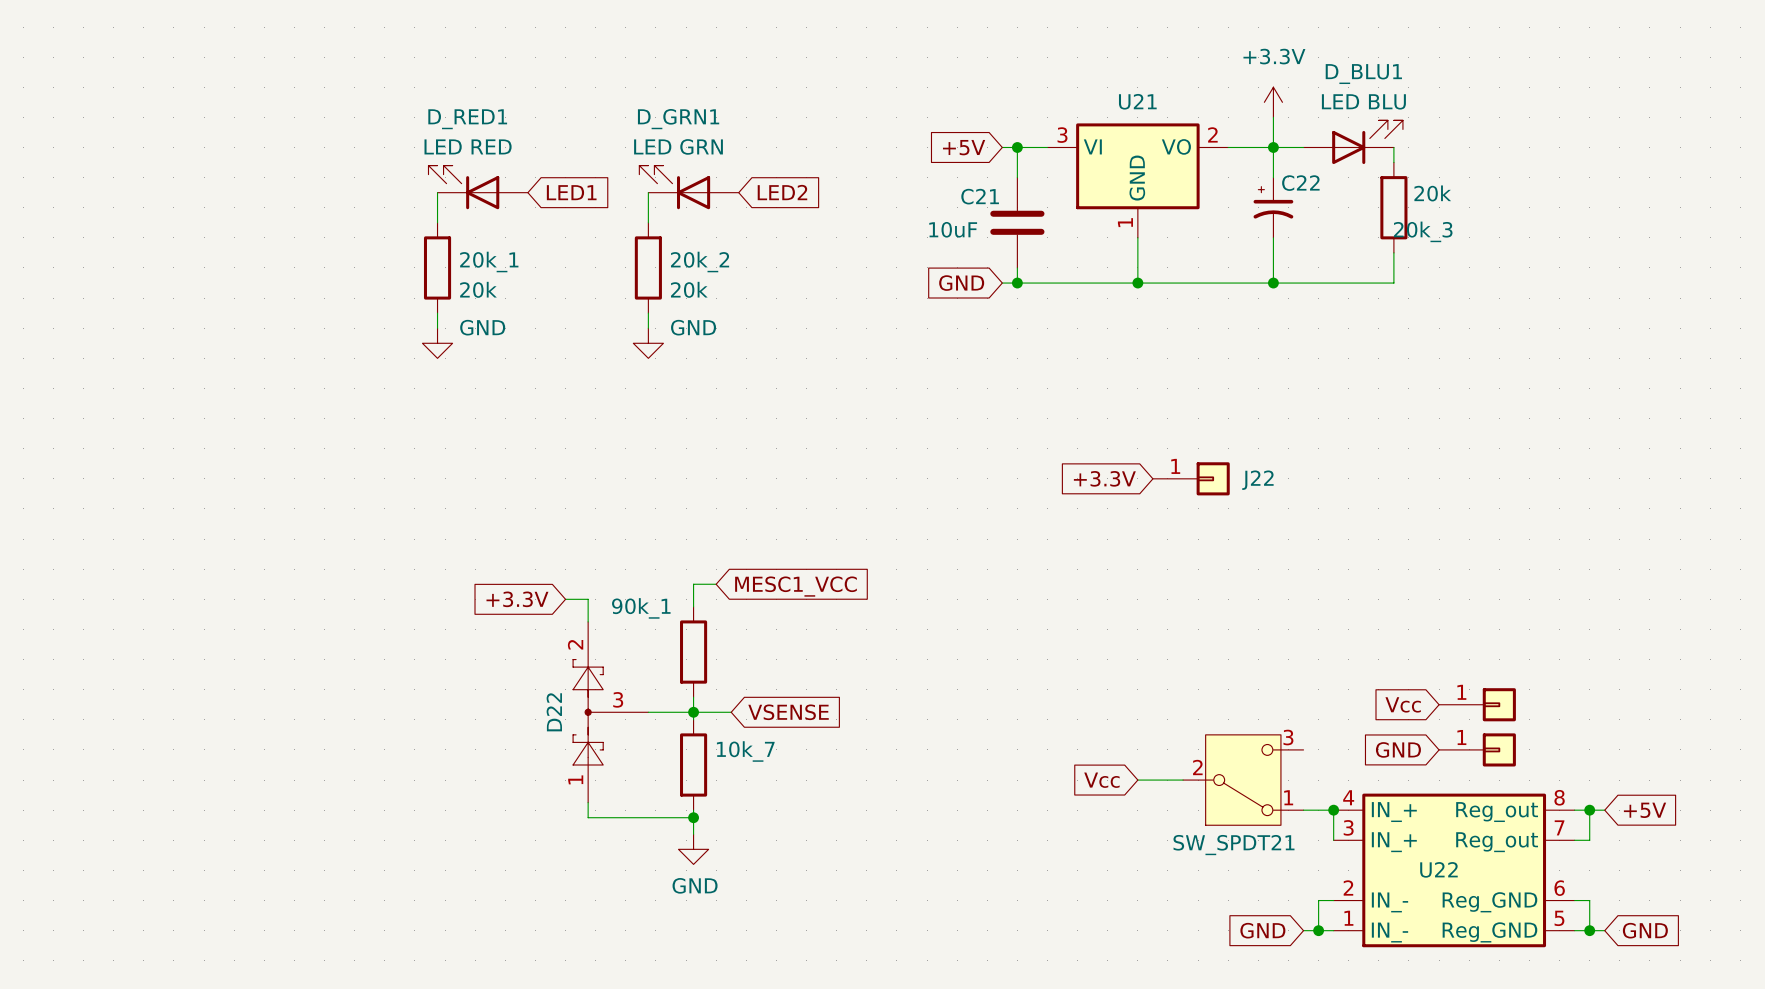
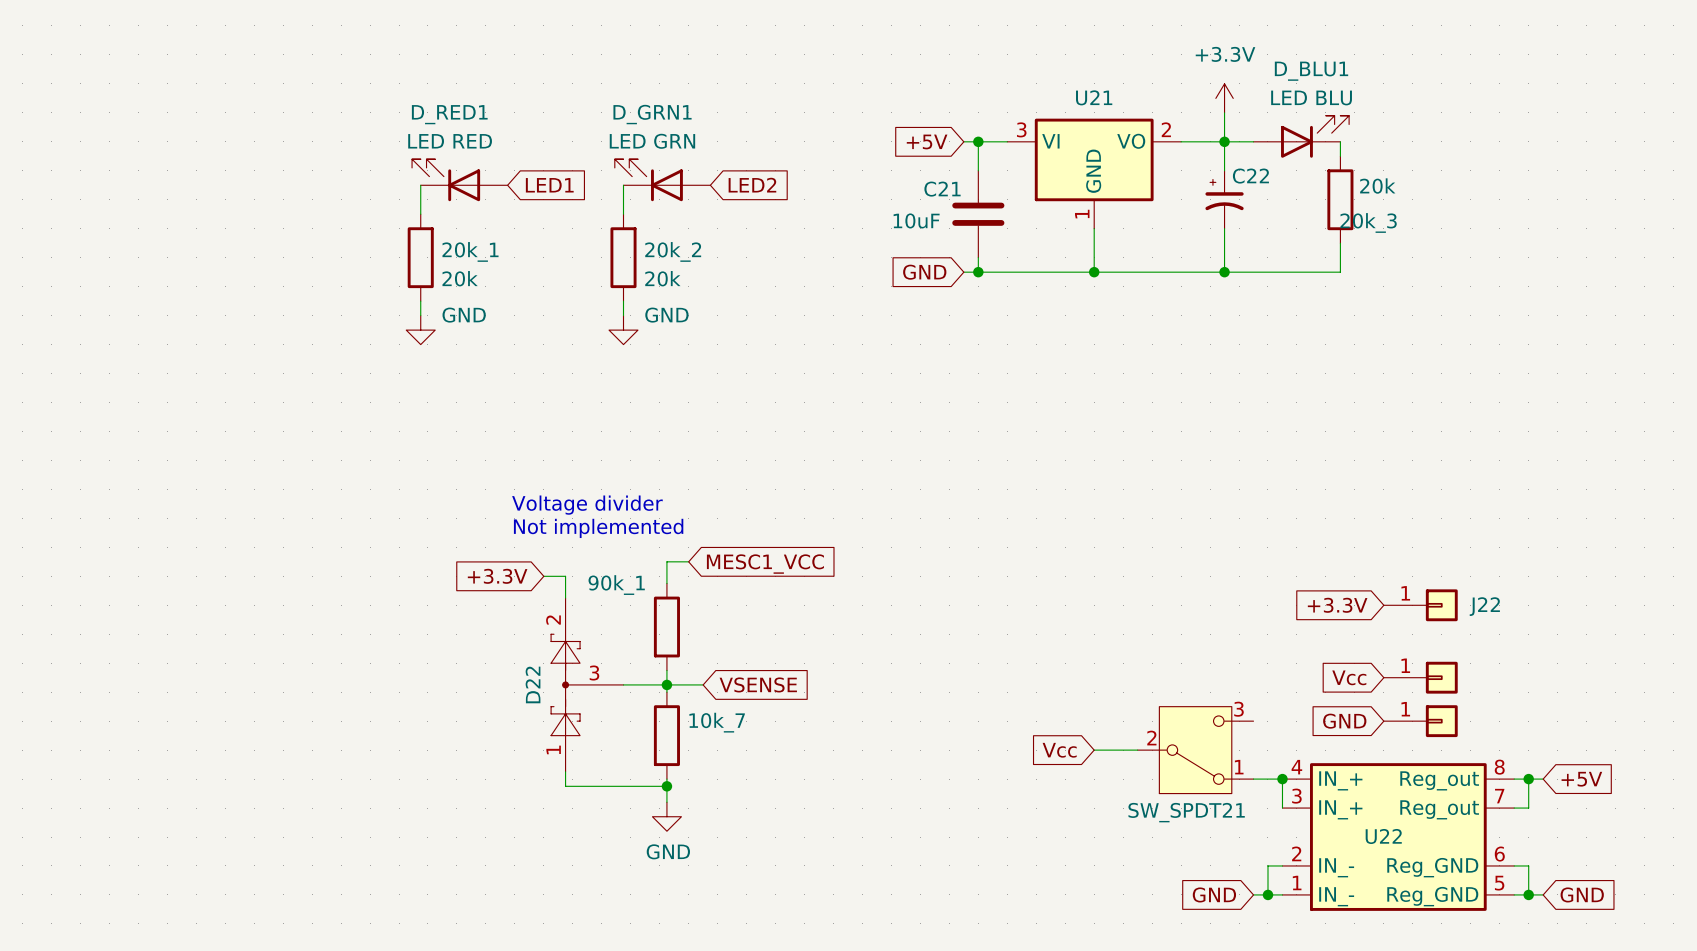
global label: +3.3V (1104, 478) -> none
J22 position: (1191, 478) -> (1420, 605)
text: none -> Voltage divider (587, 505)
text: none -> Not implemented (598, 528)
global label: none -> +3.3V (1337, 605)

